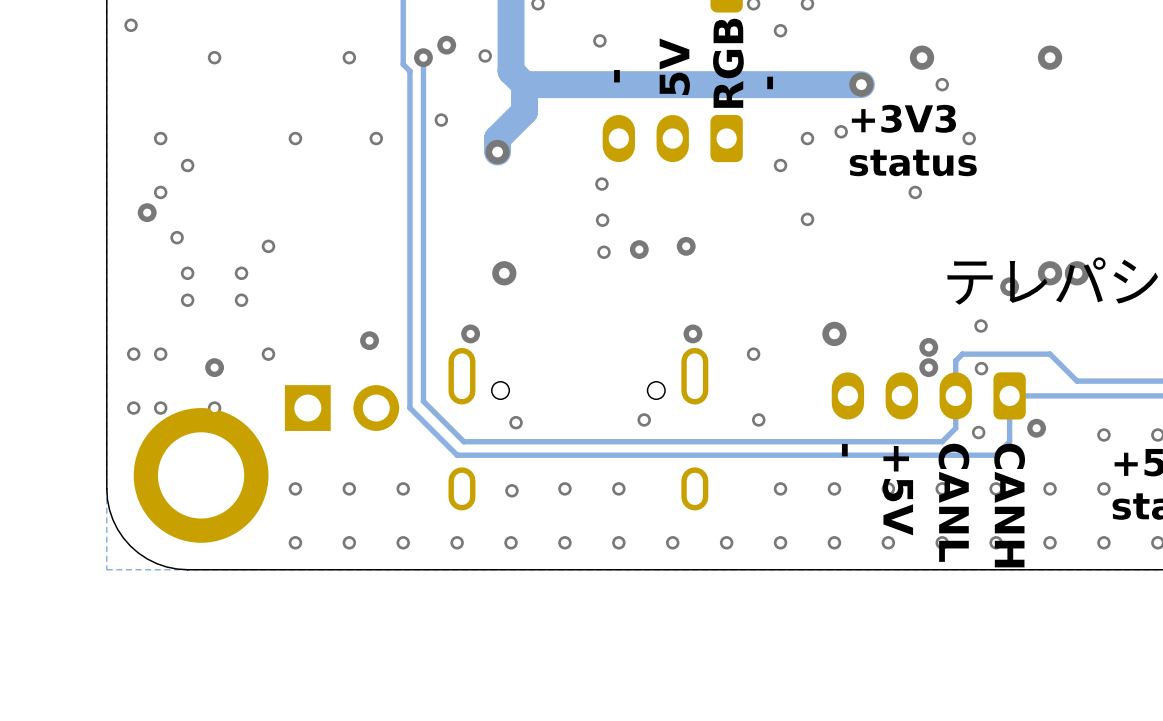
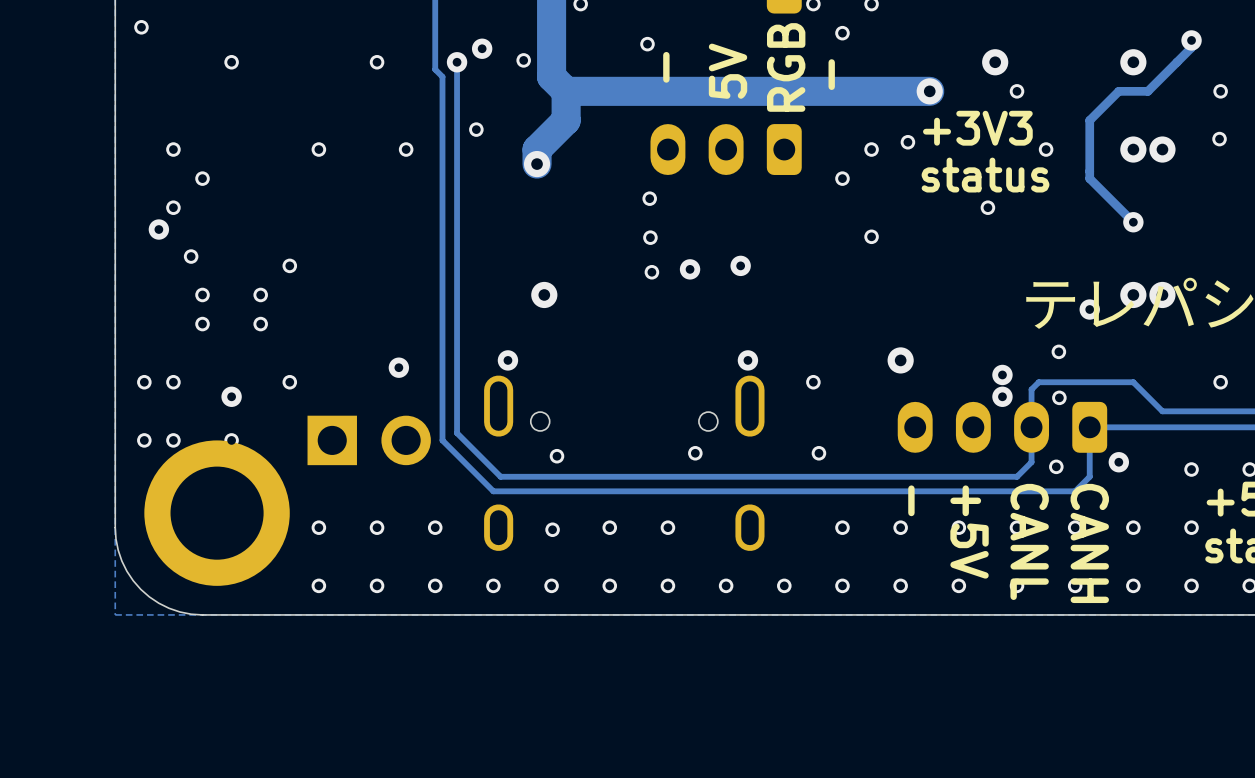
track: none -> (1191, 40) (1191, 47) (1147, 91) (1118, 91) (1089, 120) (1089, 178) (1133, 222)
via: none -> (1191, 40)
via: none -> (1220, 91)
via: none -> (1219, 139)
via: none -> (1133, 149)
via: none -> (1162, 149)
via: none -> (1133, 222)
via: none -> (1220, 382)

